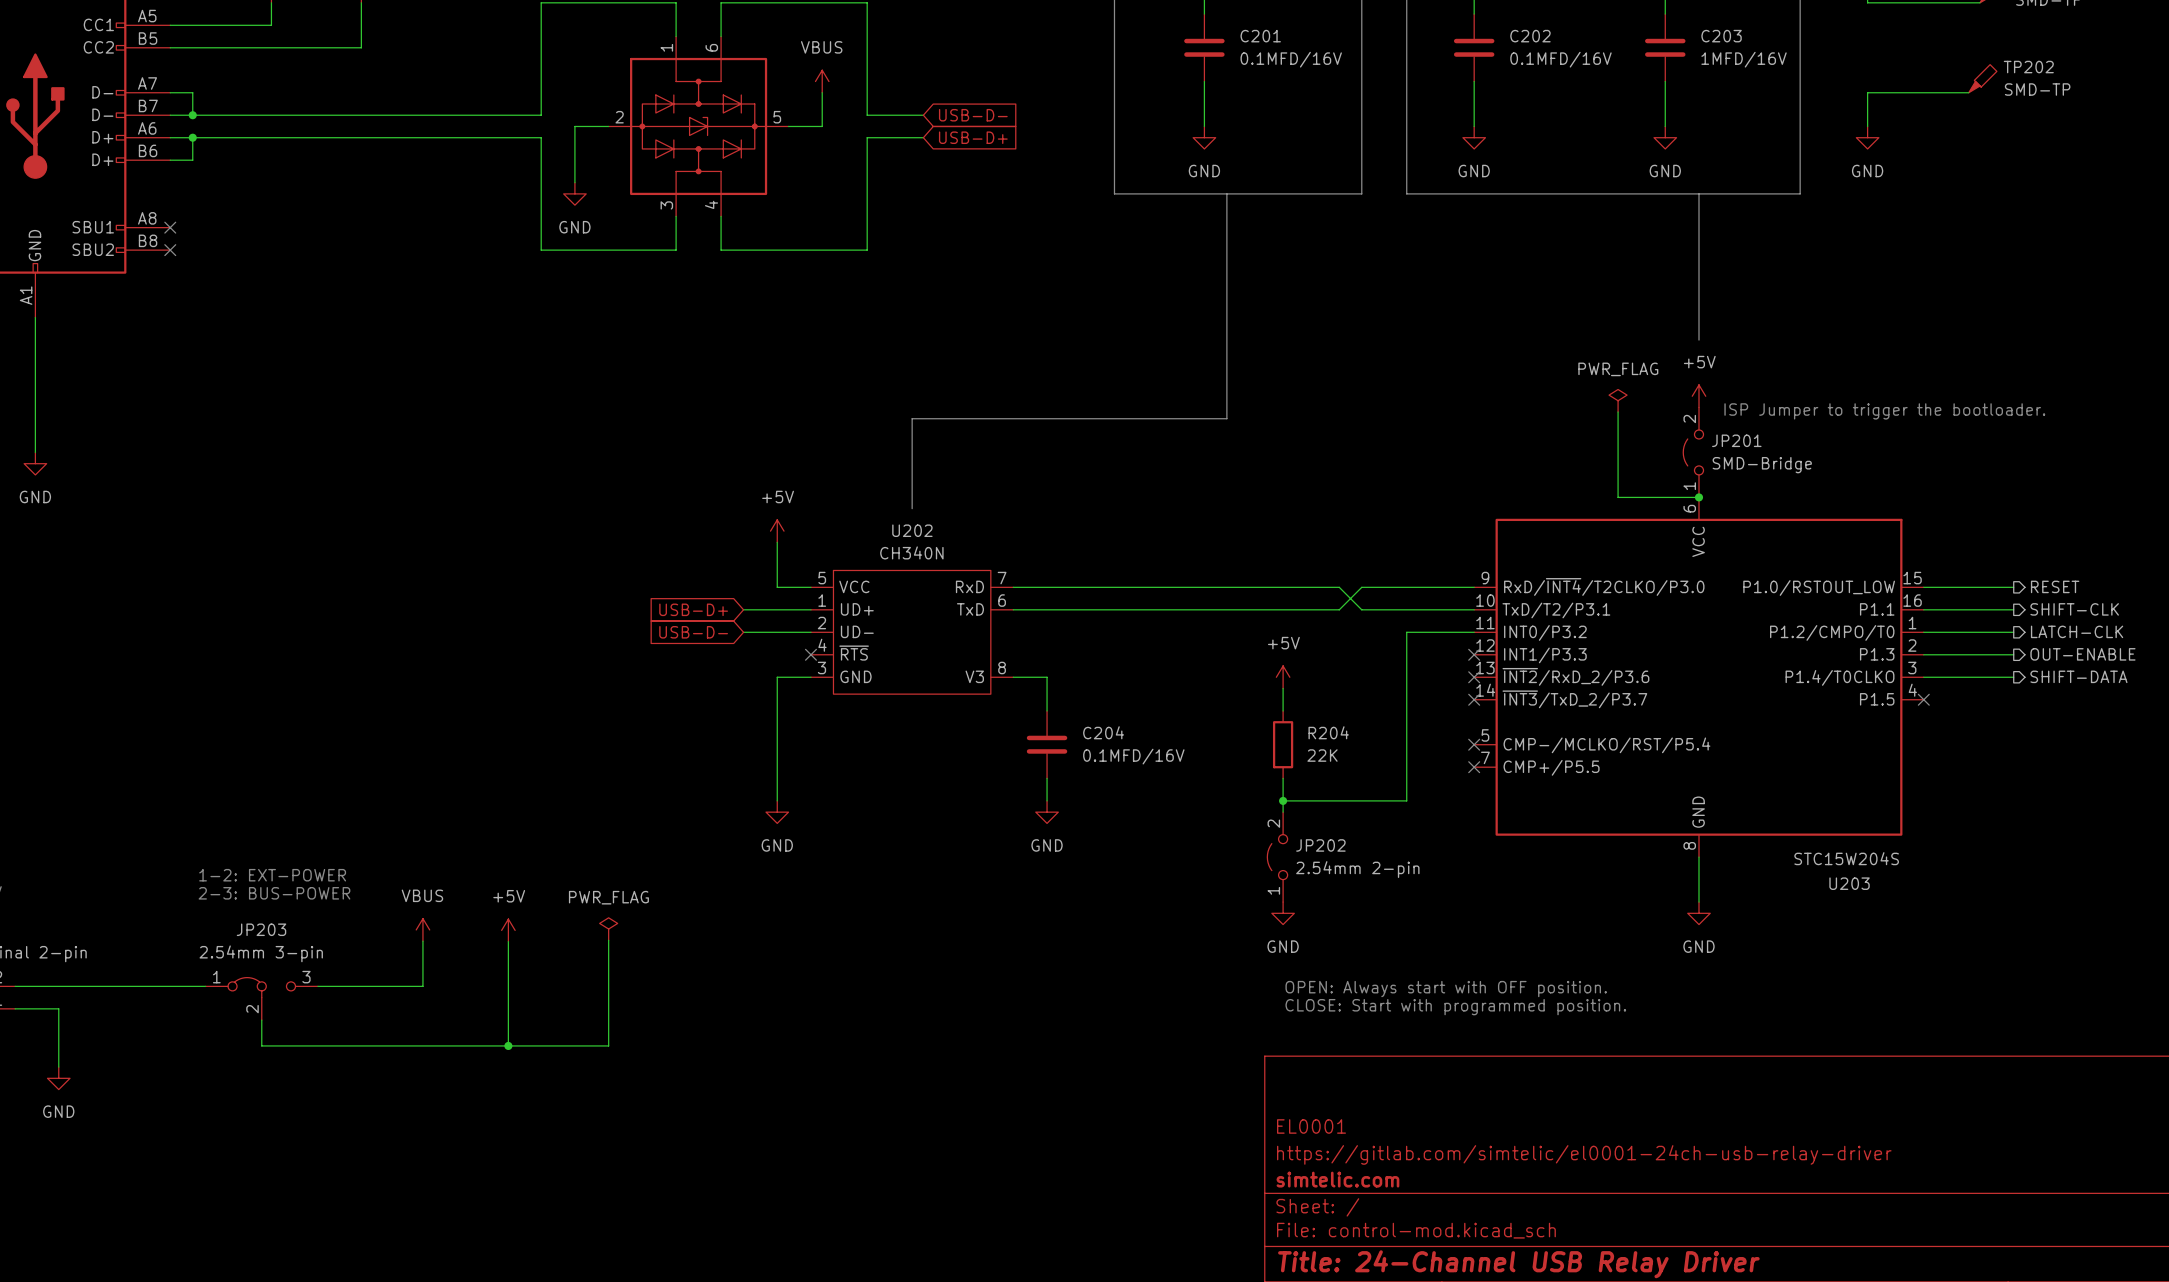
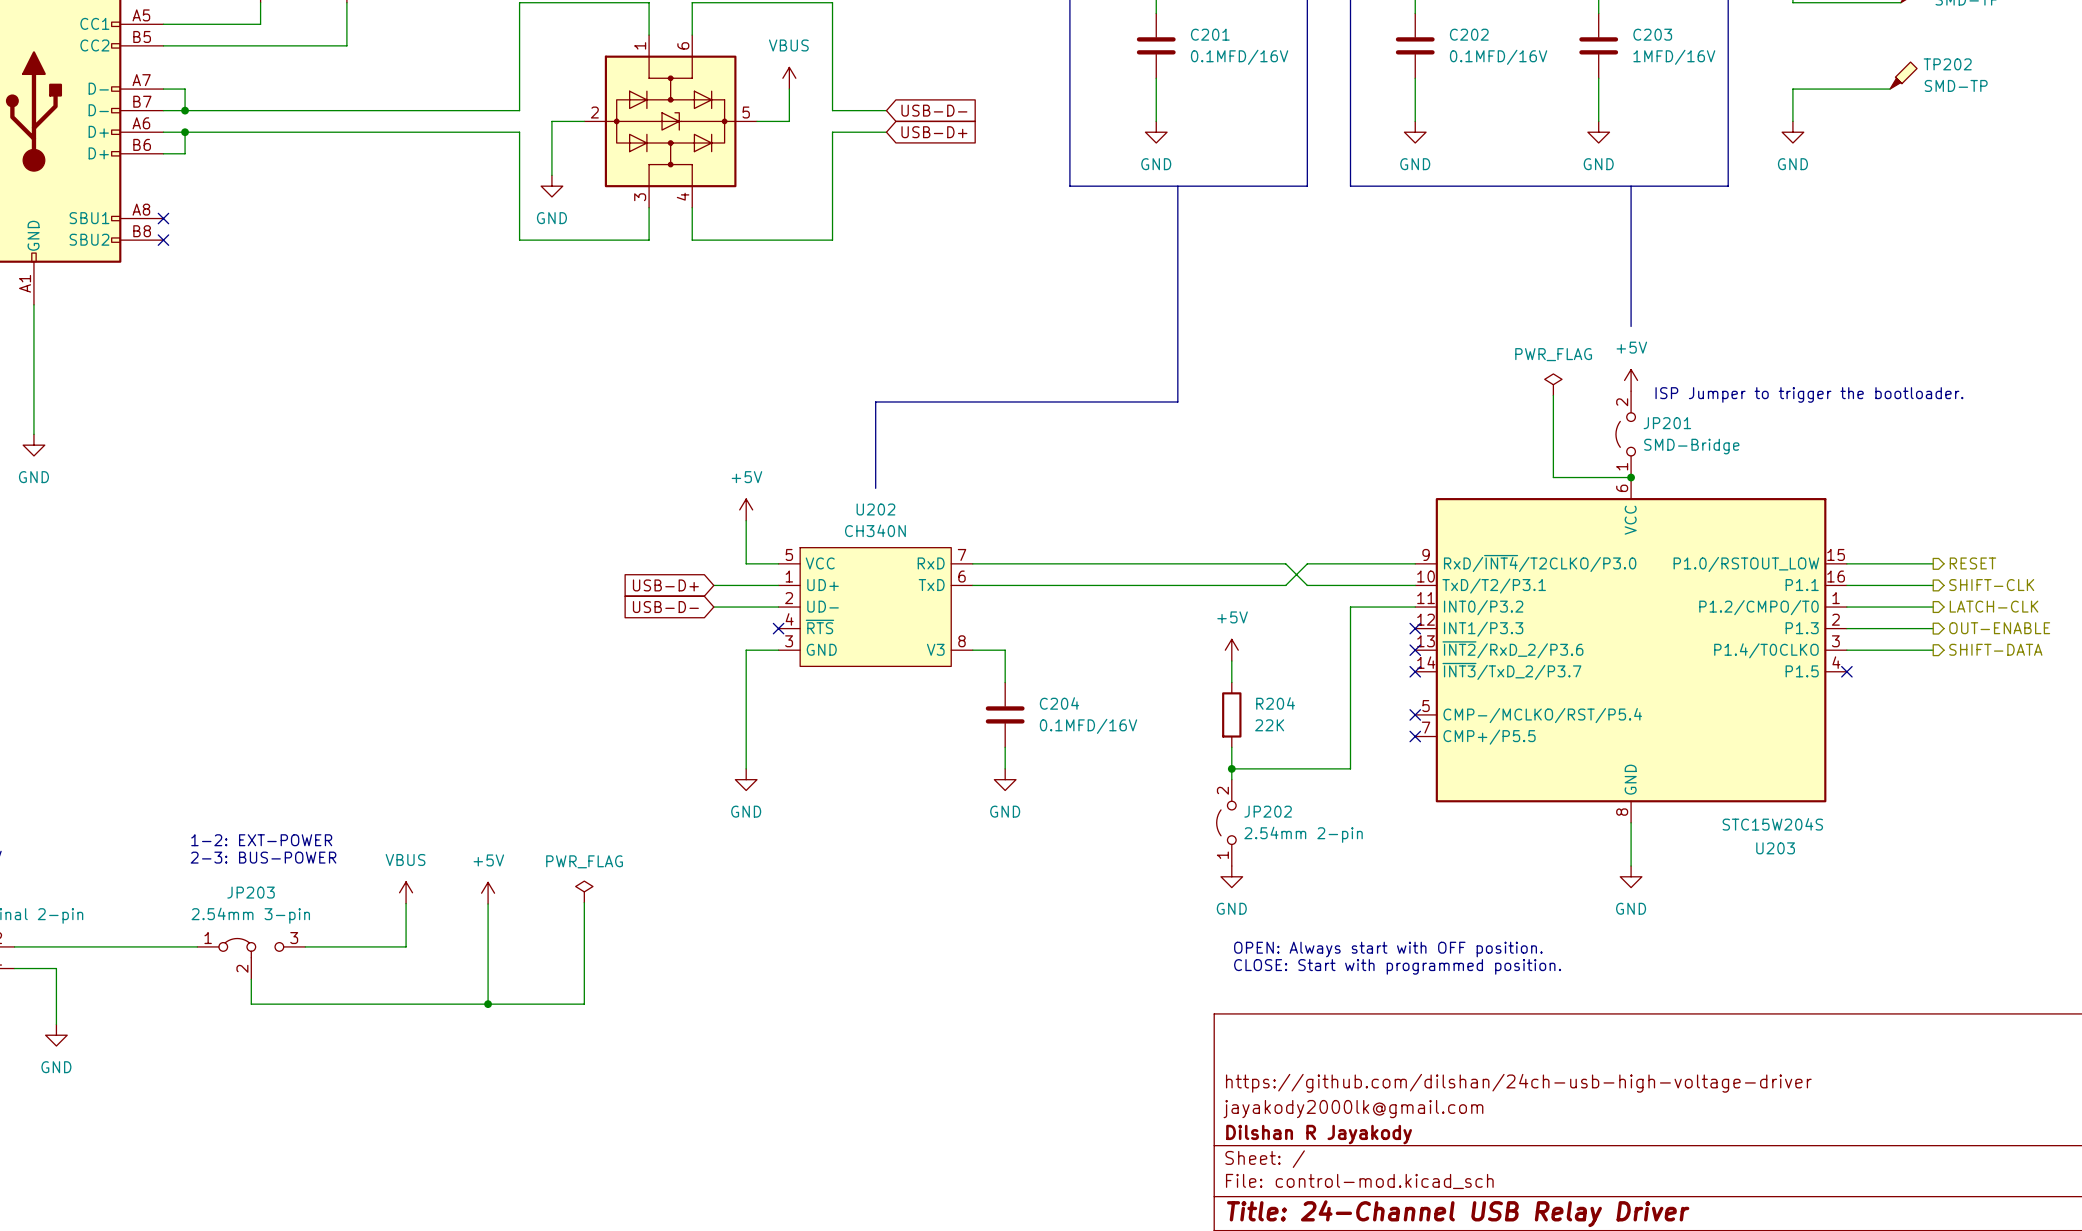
title block: EL0001 (1311, 1126) -> https://github.com/dilshan/24ch-usb-high-voltage-driver (1518, 1083)
title block: https://gitlab.com/simtelic/el0001-24ch-usb-relay-driver (1584, 1154) -> jayakody2000lk@gmail.com (1353, 1109)
title block: simtelic.com (1337, 1179) -> Dilshan R Jayakody (1319, 1134)

